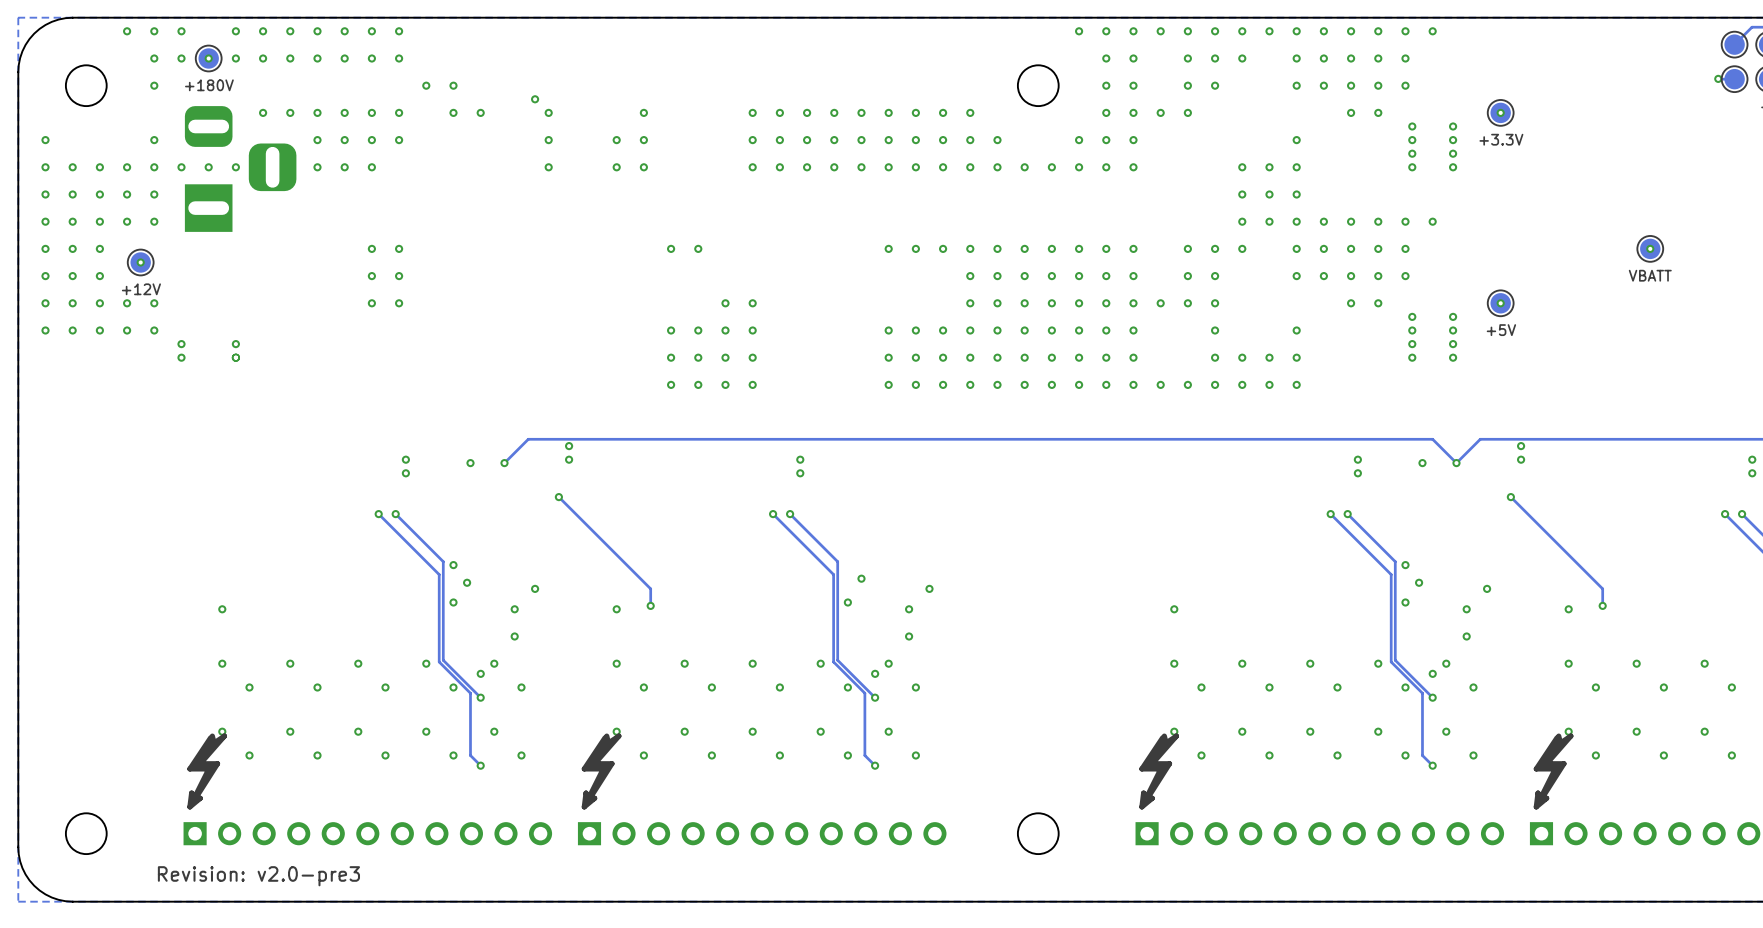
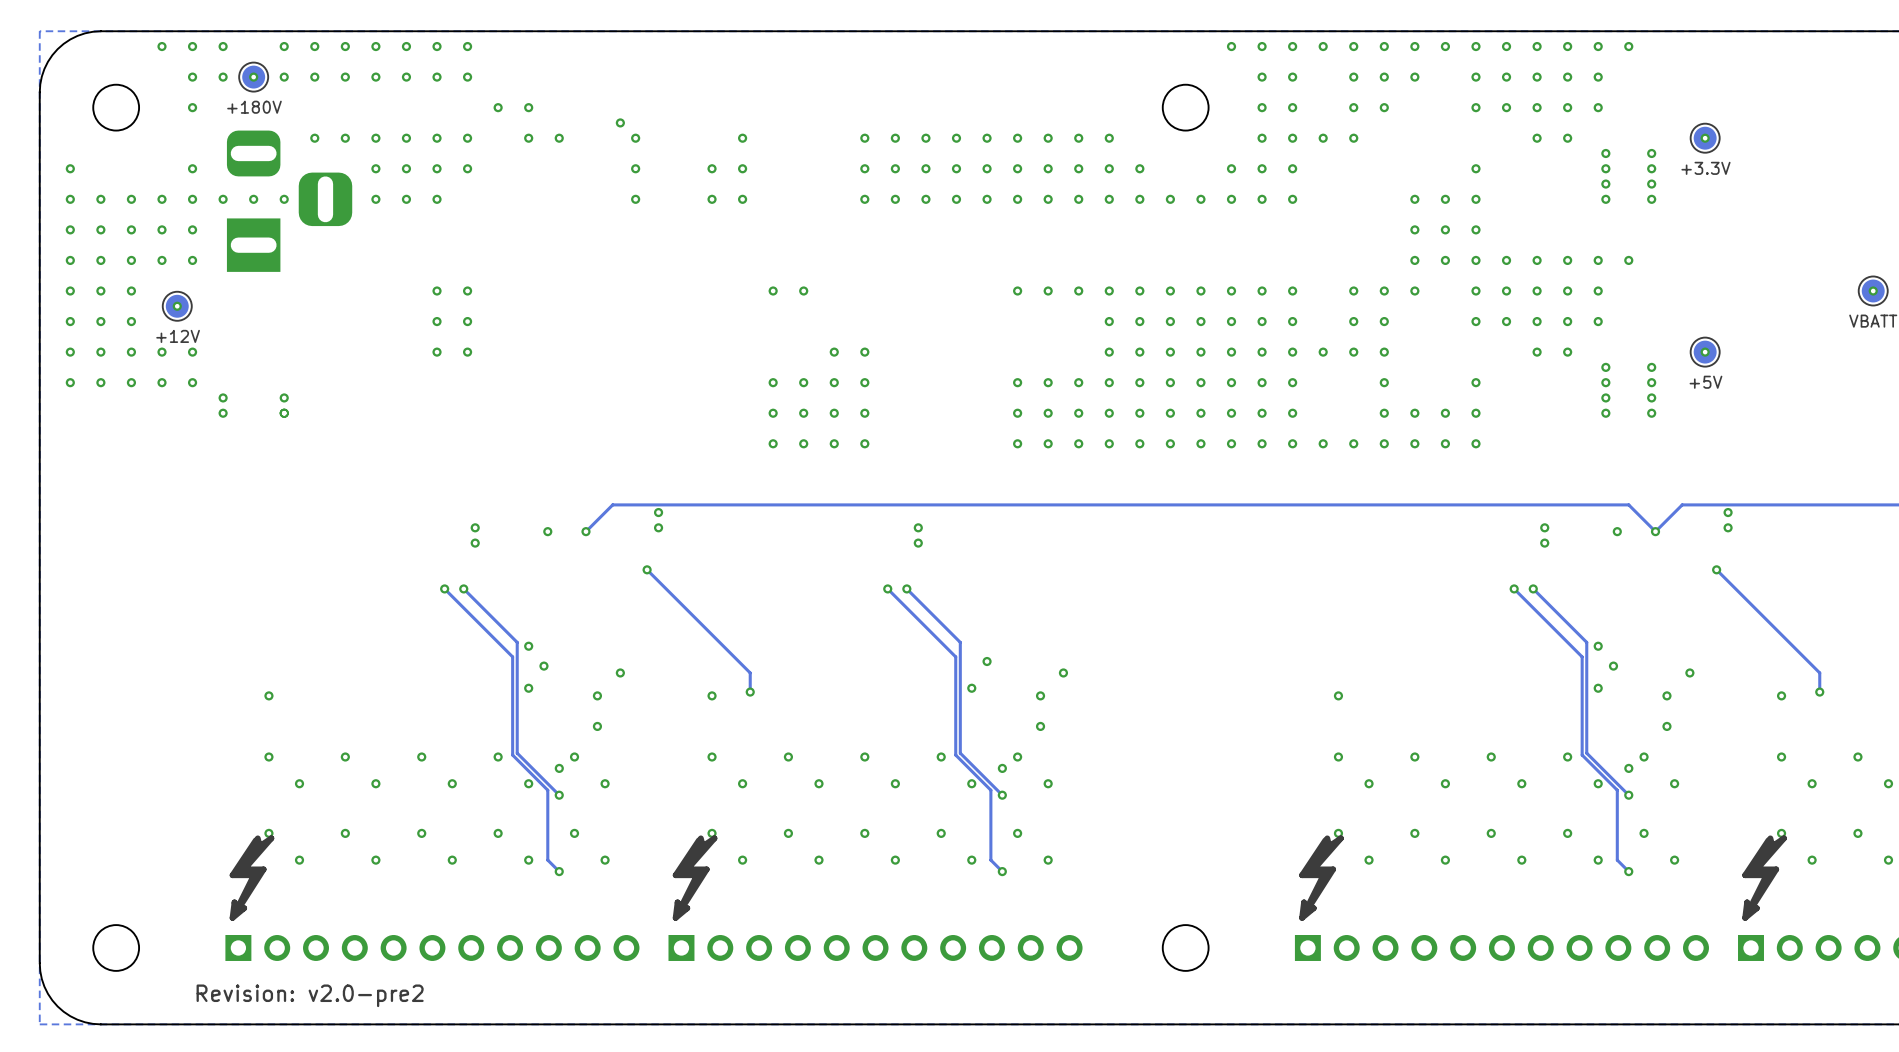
text: Revision: v2.0-pre3 (258, 876) -> Revision: v2.0-pre2 (310, 995)

